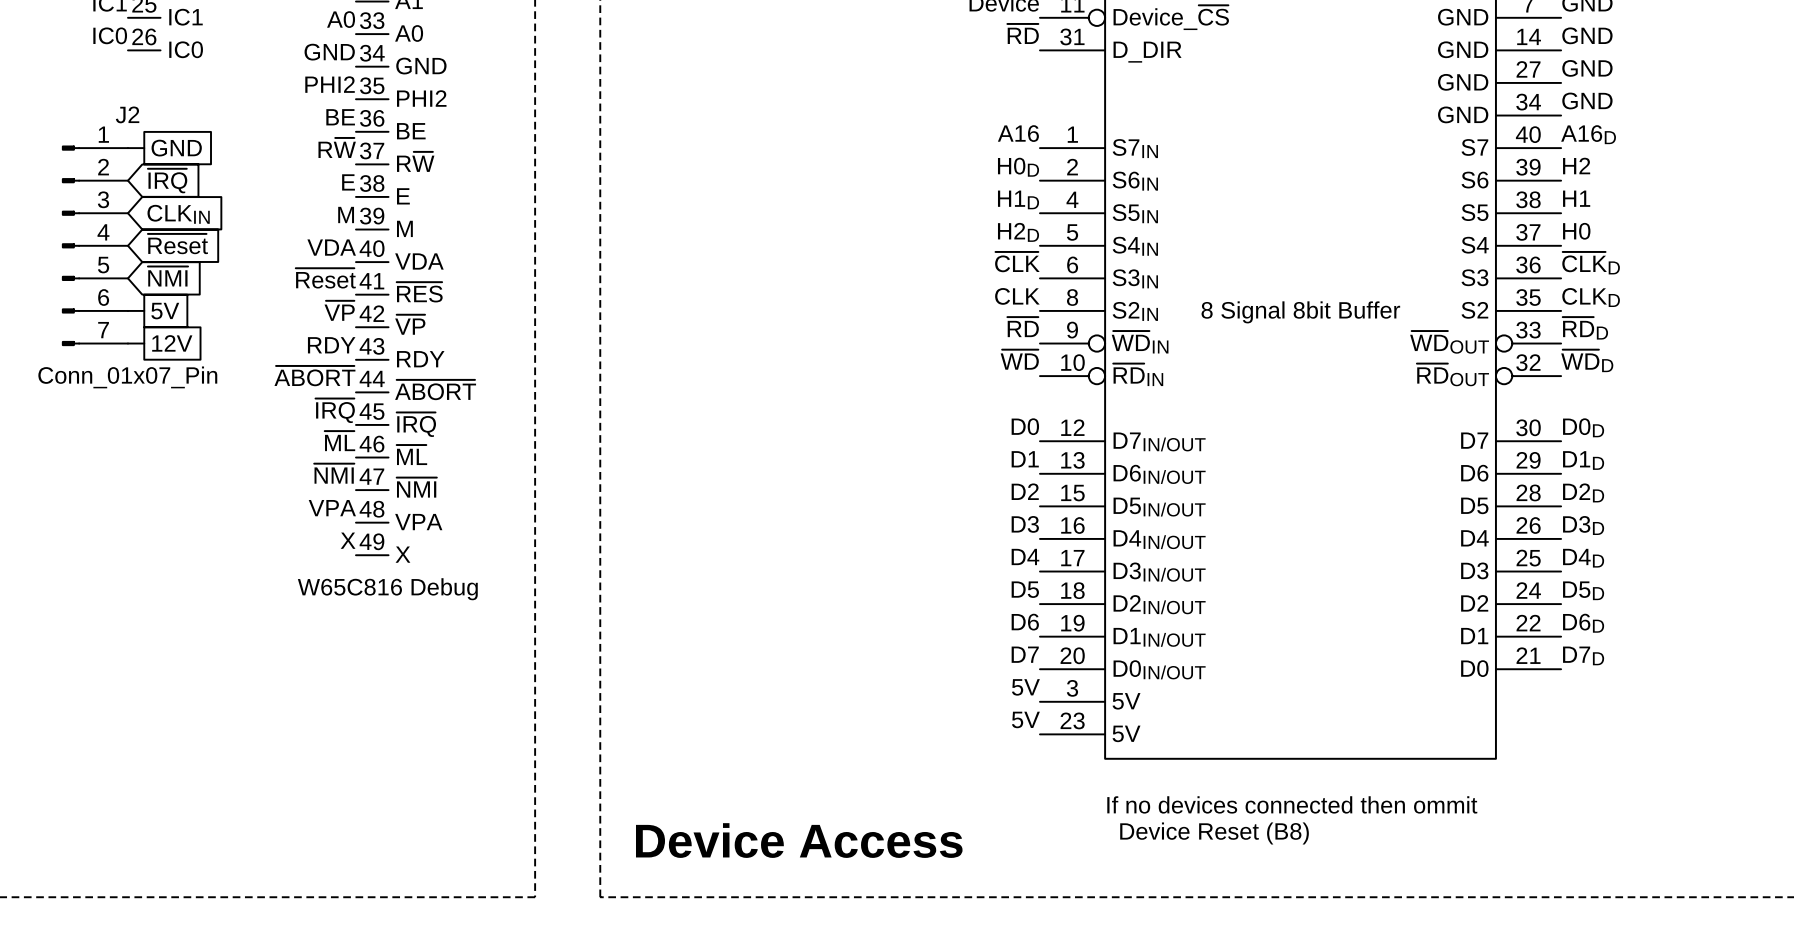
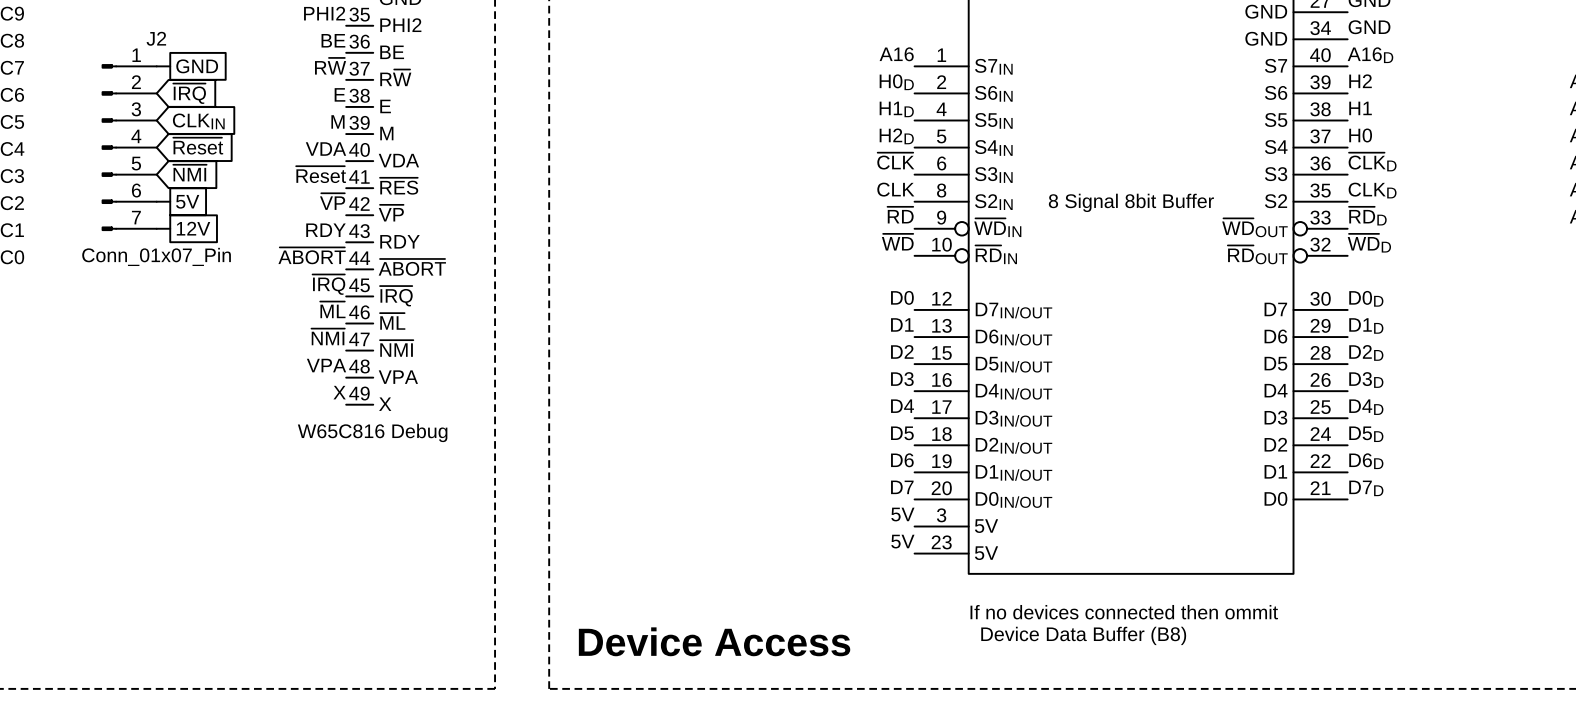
text: Device Reset (B8) (1214, 833) -> Device Data Buffer (B8) (1083, 635)

